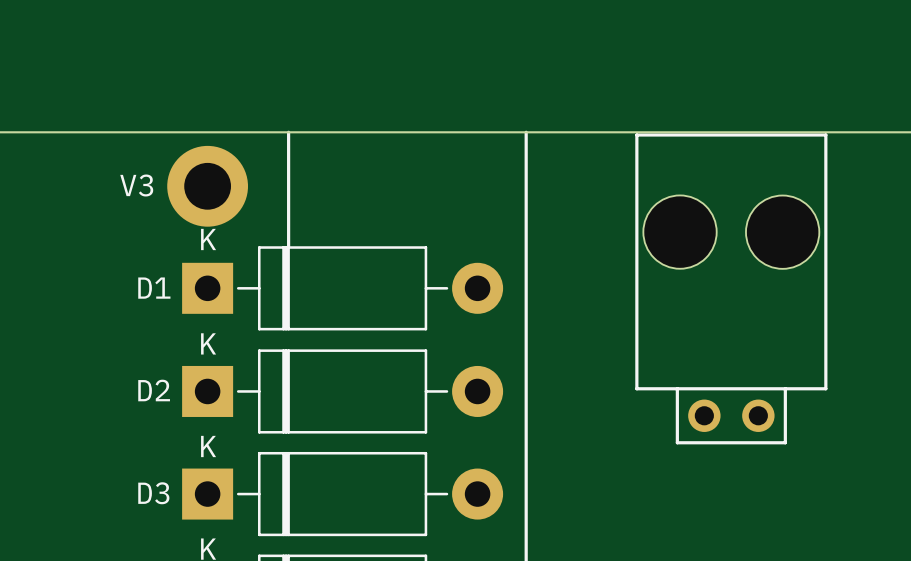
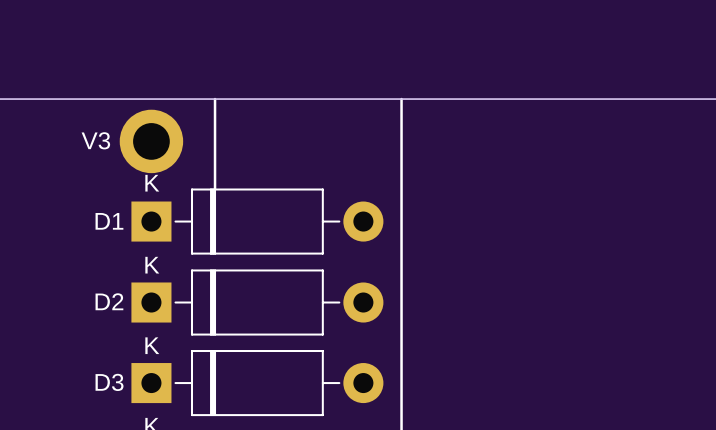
part: (731, 288) -> none

